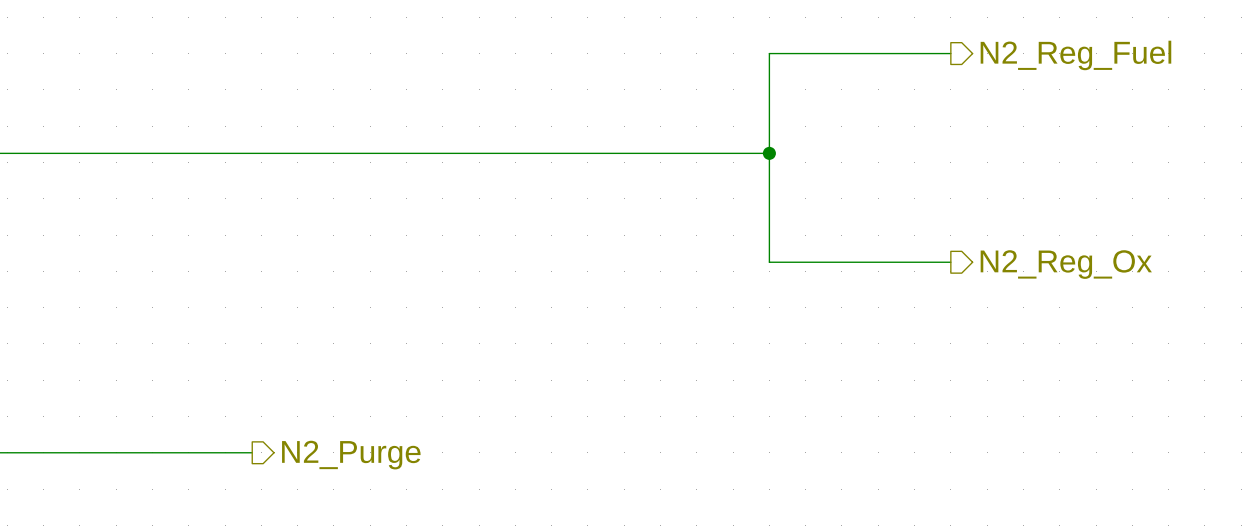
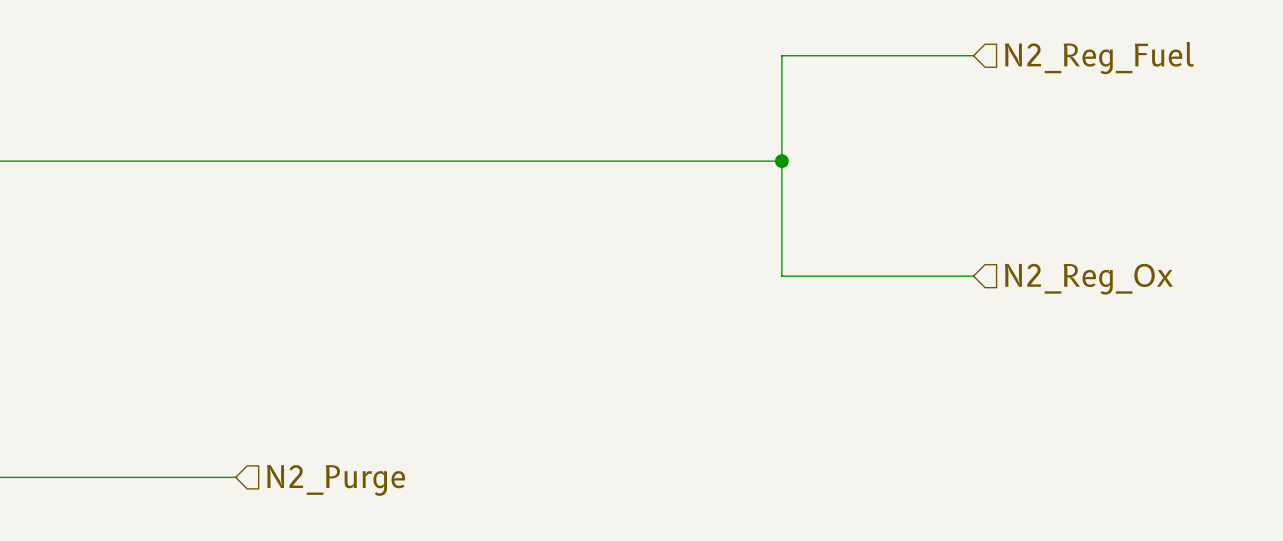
hierarchical label shape: output (1075, 55) -> input (1099, 58)
hierarchical label shape: output (1066, 264) -> input (1088, 279)
hierarchical label shape: output (351, 455) -> input (336, 480)

